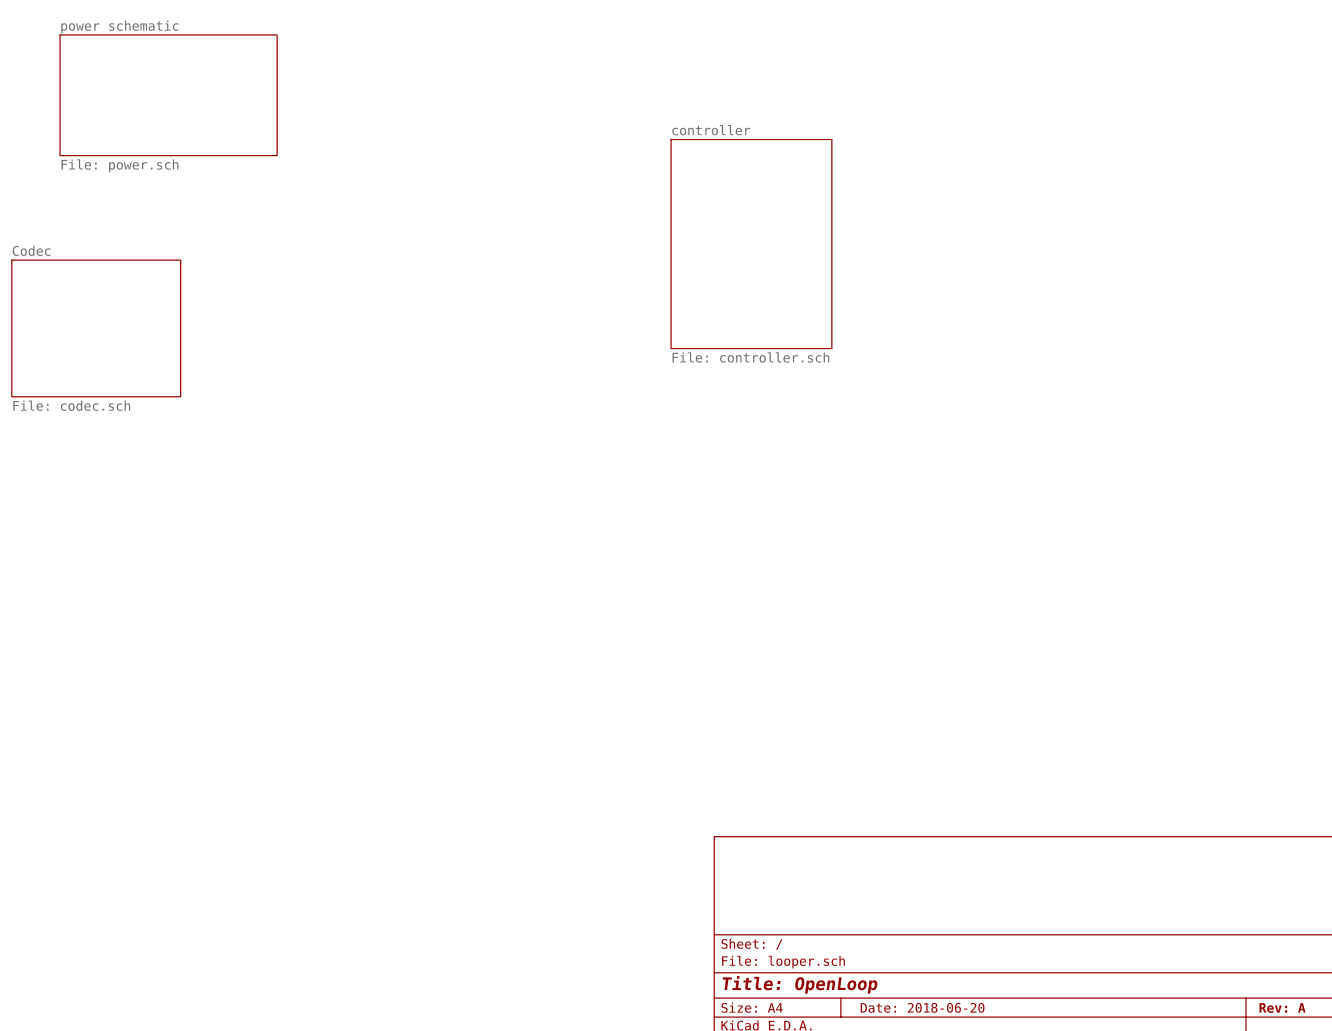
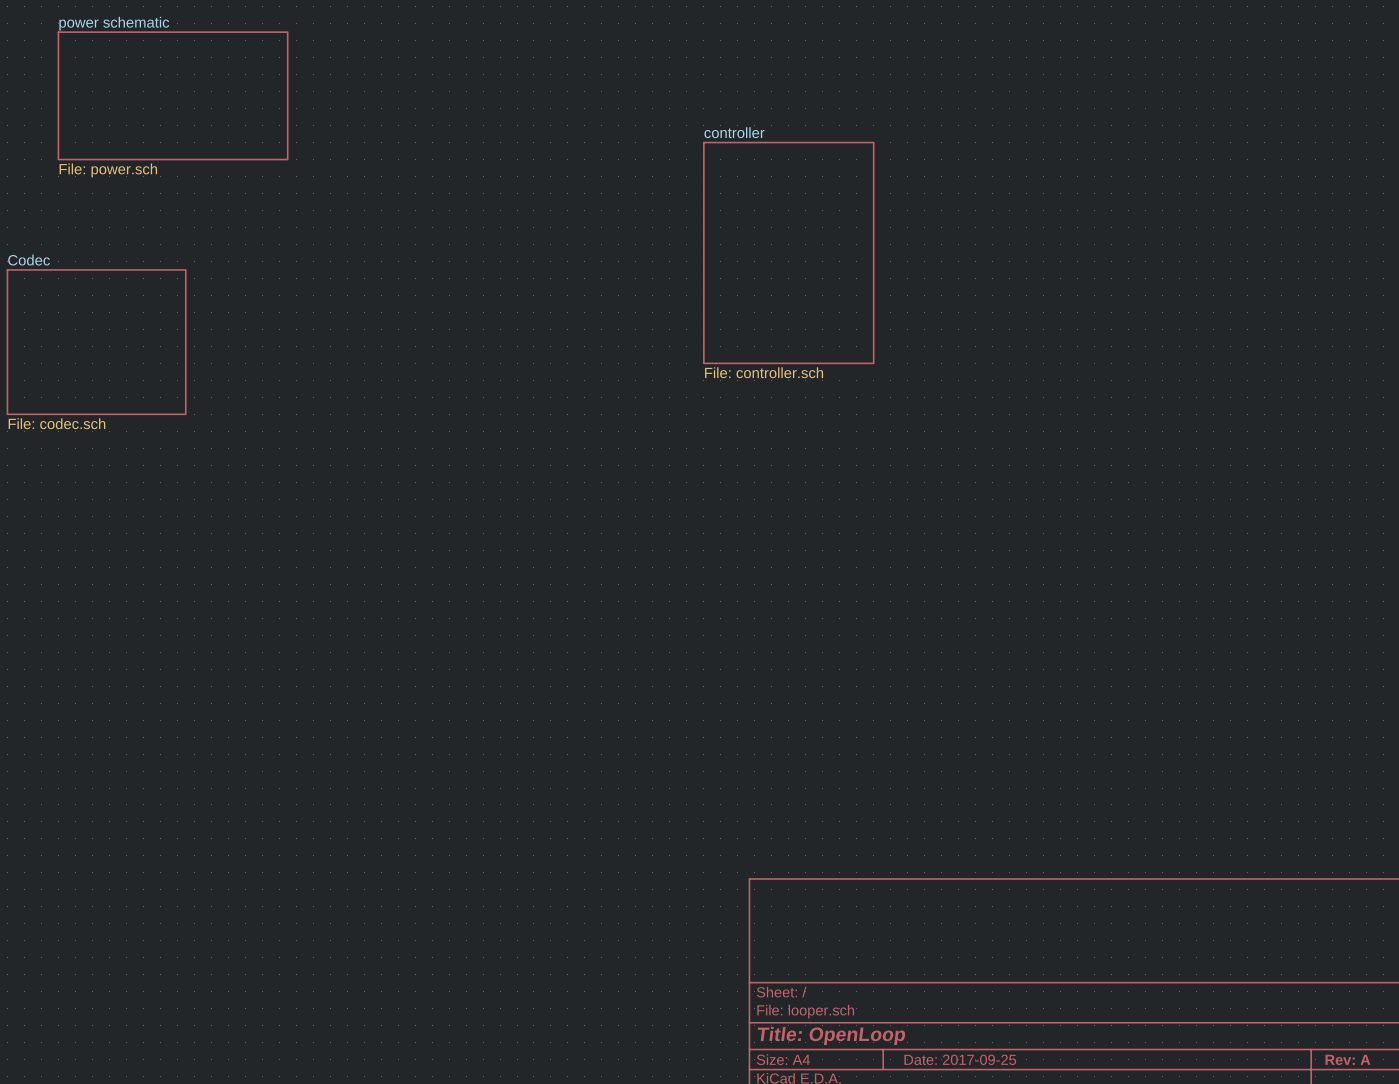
title block: Date: 2018-06-20 (922, 1007) -> Date: 2017-09-25 (960, 1059)

